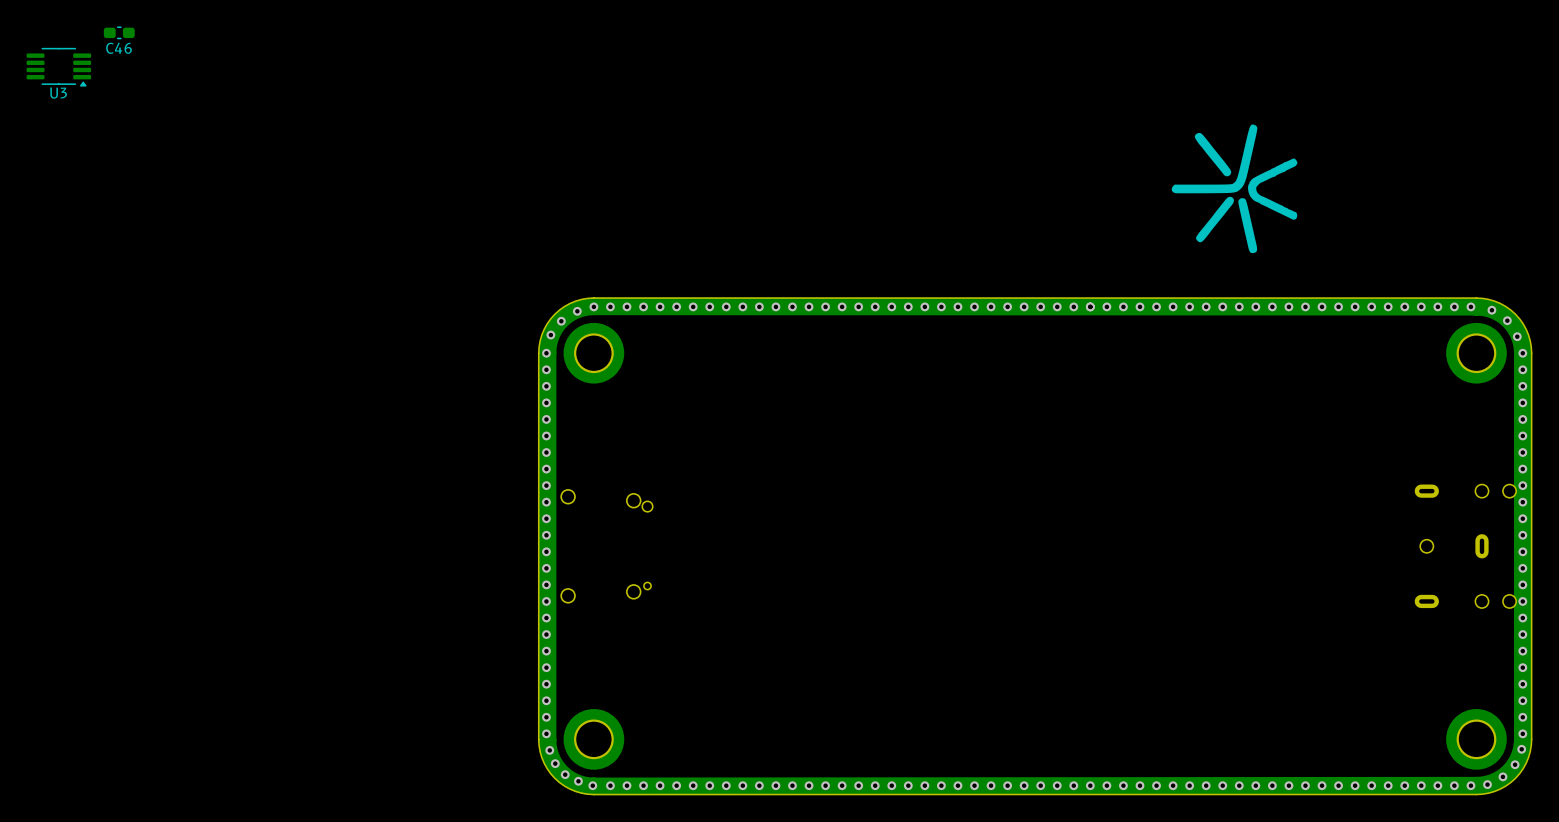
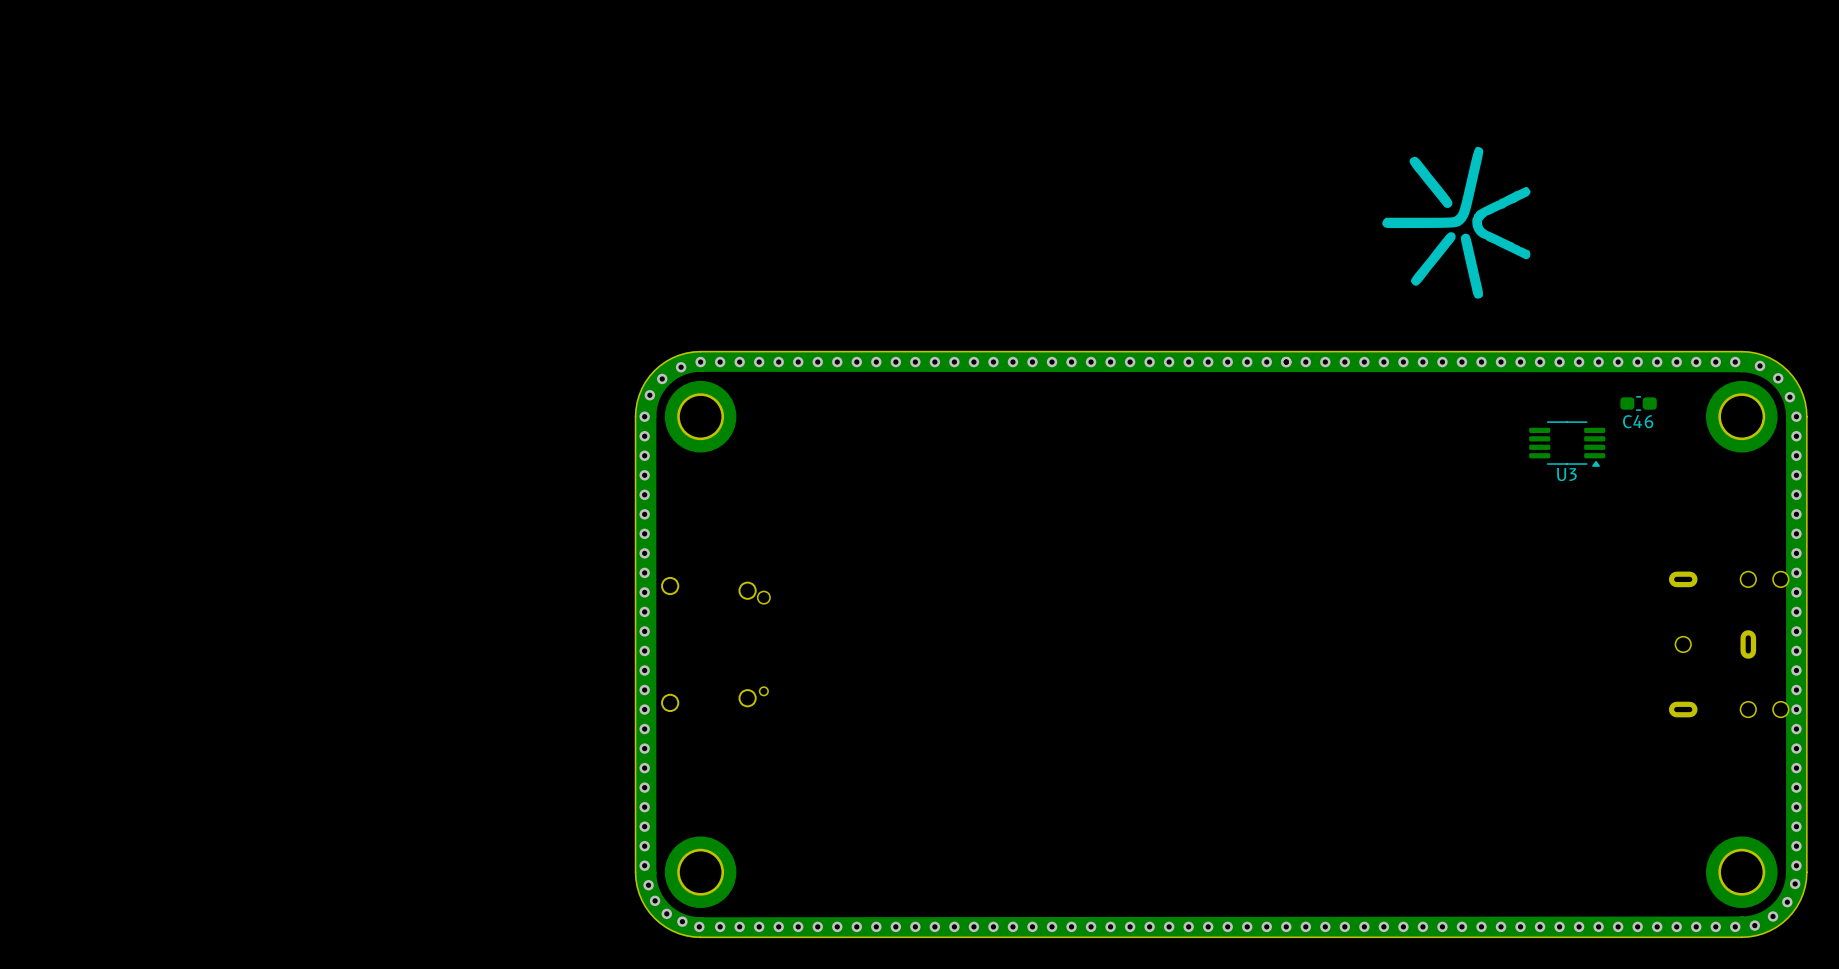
C46 position: (119, 32) -> (1638, 403)
U3 position: (58, 67) -> (1567, 444)

